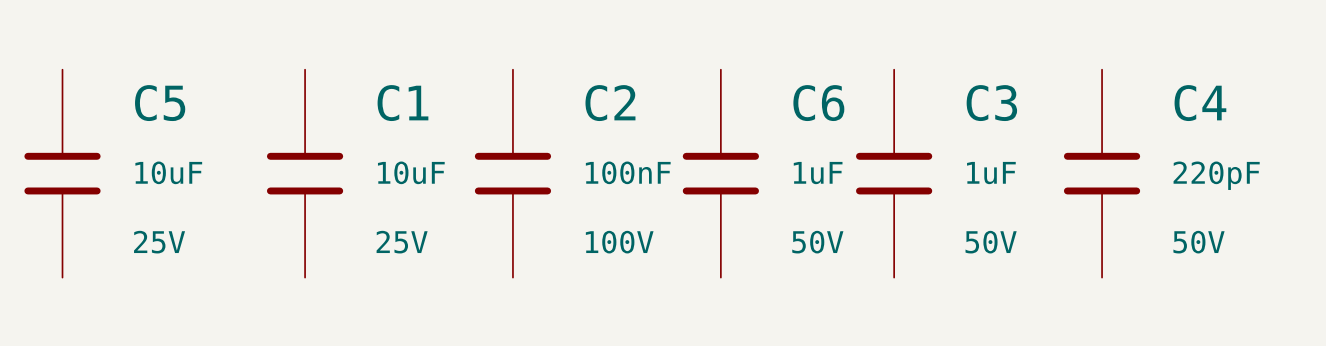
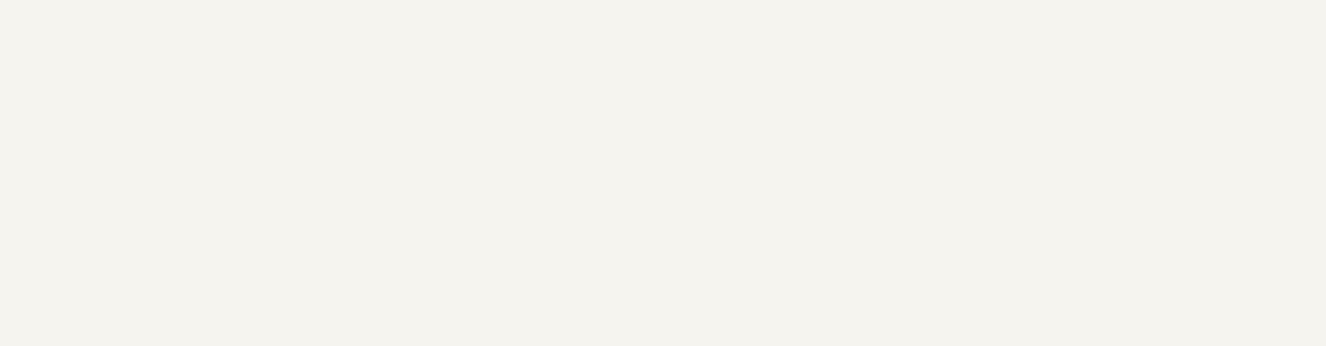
C5: 10uF (62, 173) -> none
C1: 10uF (305, 173) -> none
C2: 100nF (512, 173) -> none
C6: 1uF (720, 173) -> none
C3: 1uF (894, 173) -> none
C4: 220pF (1102, 173) -> none

